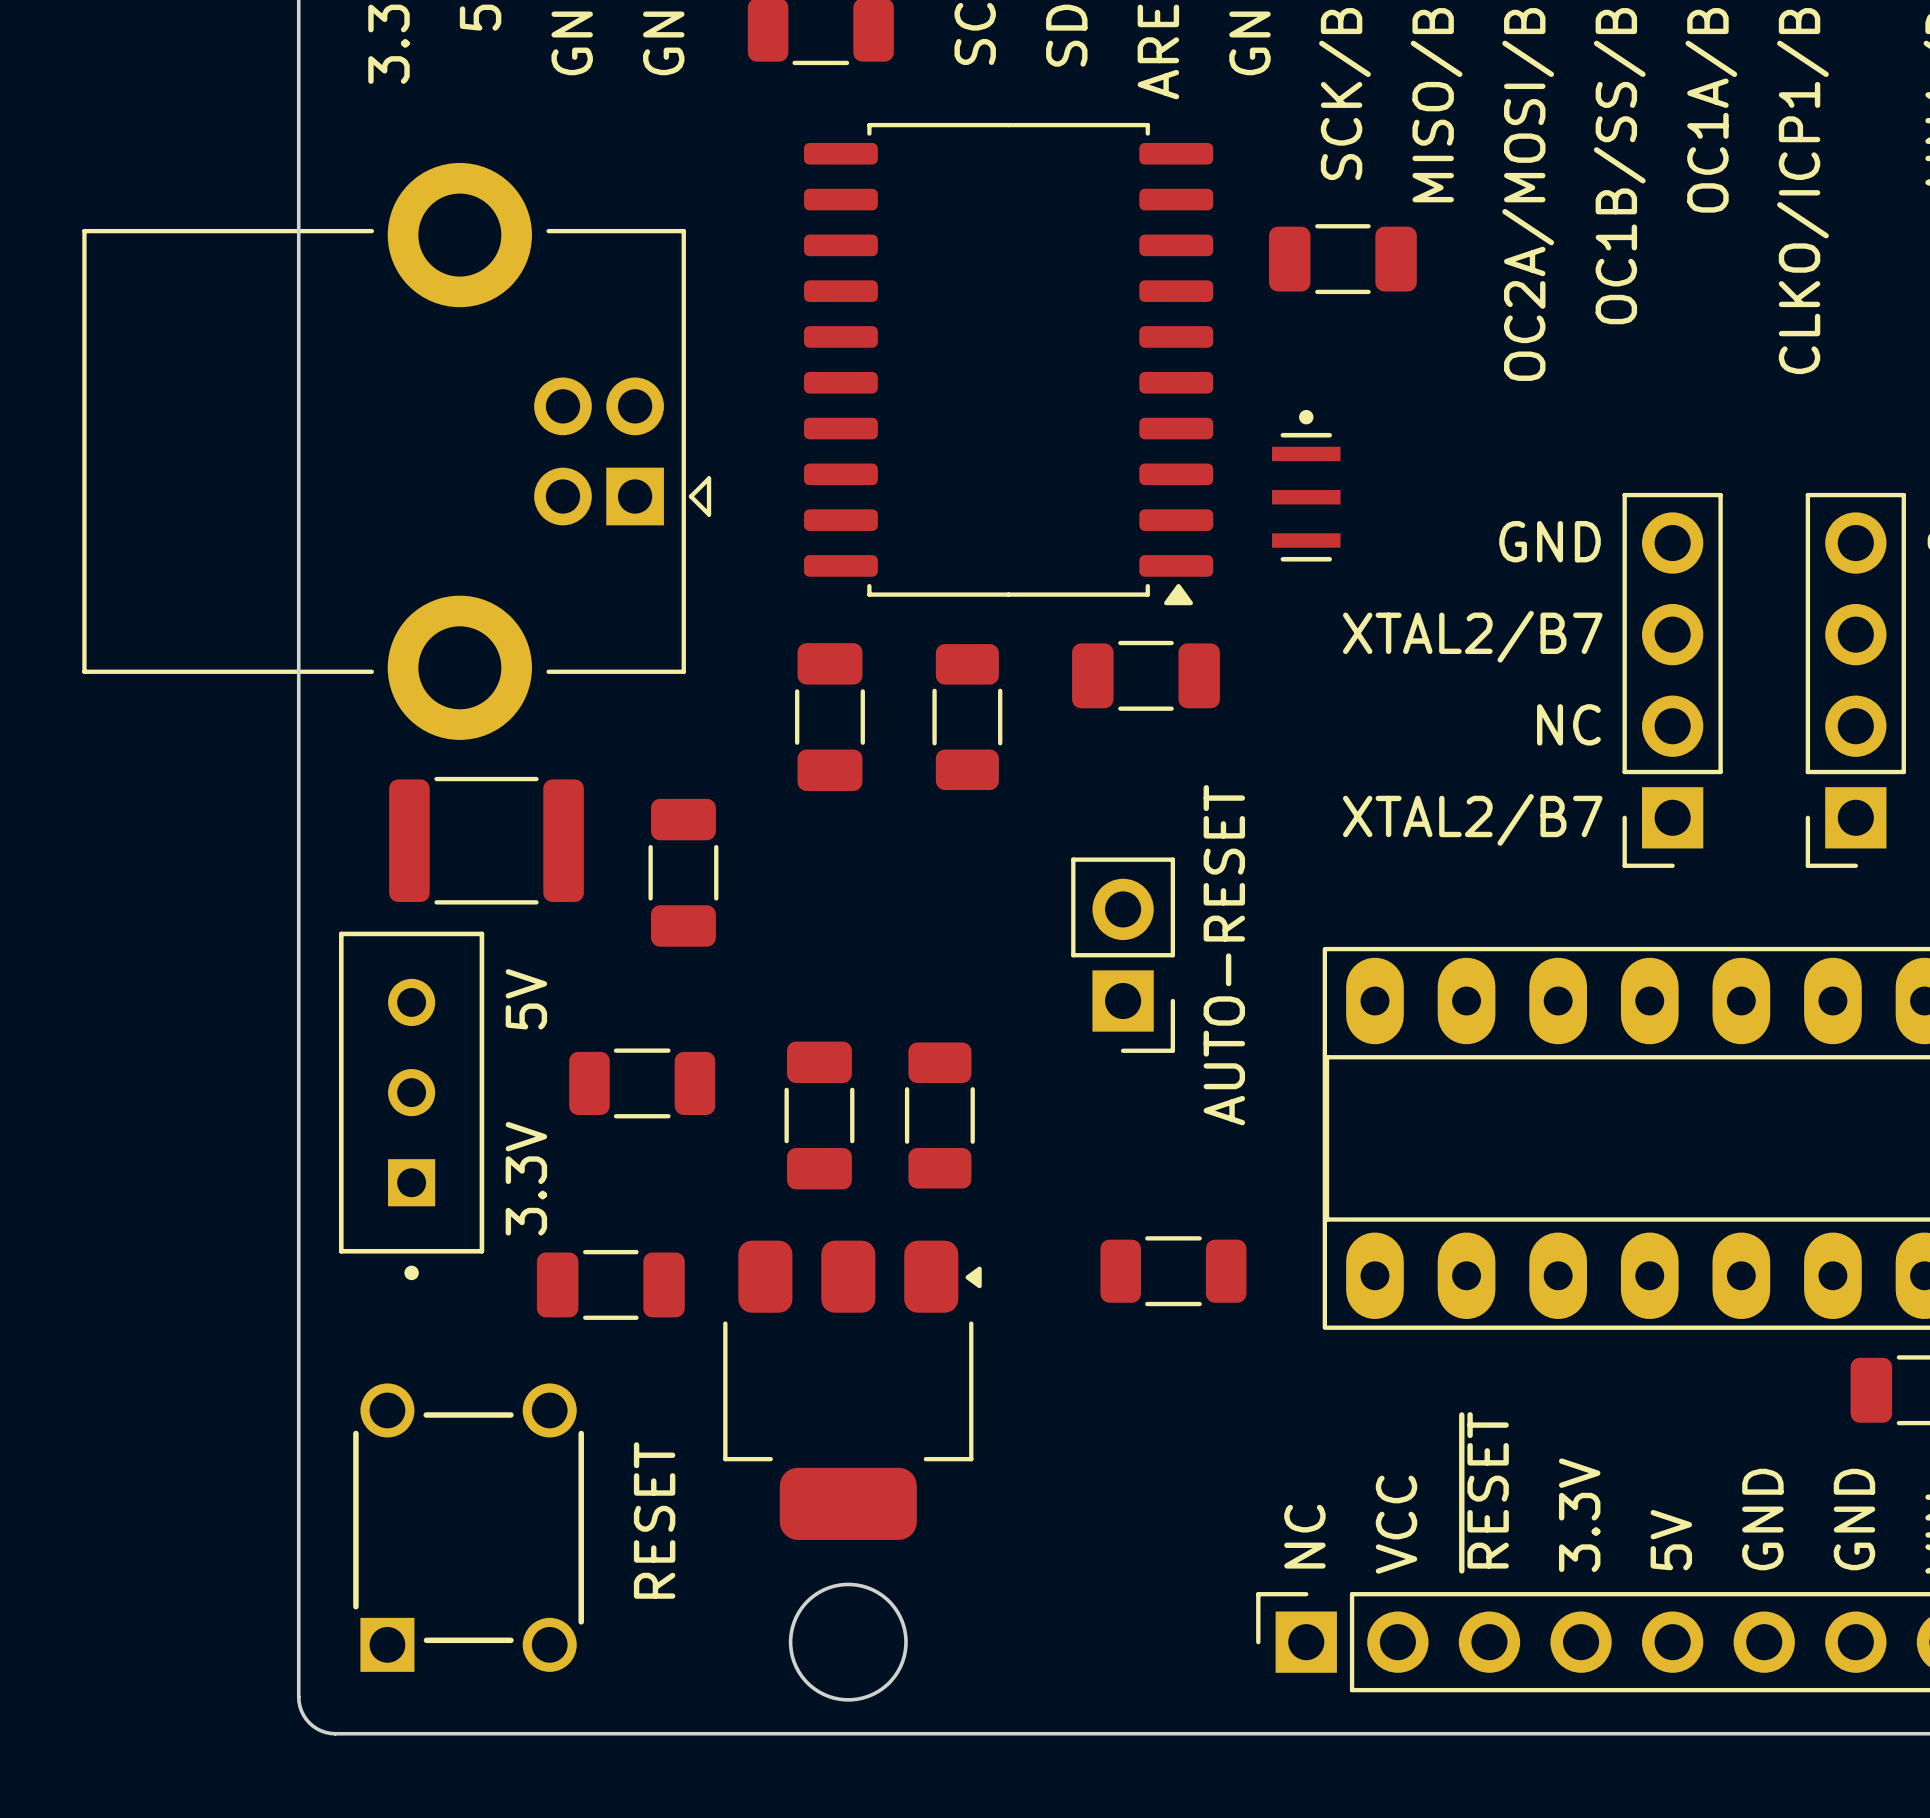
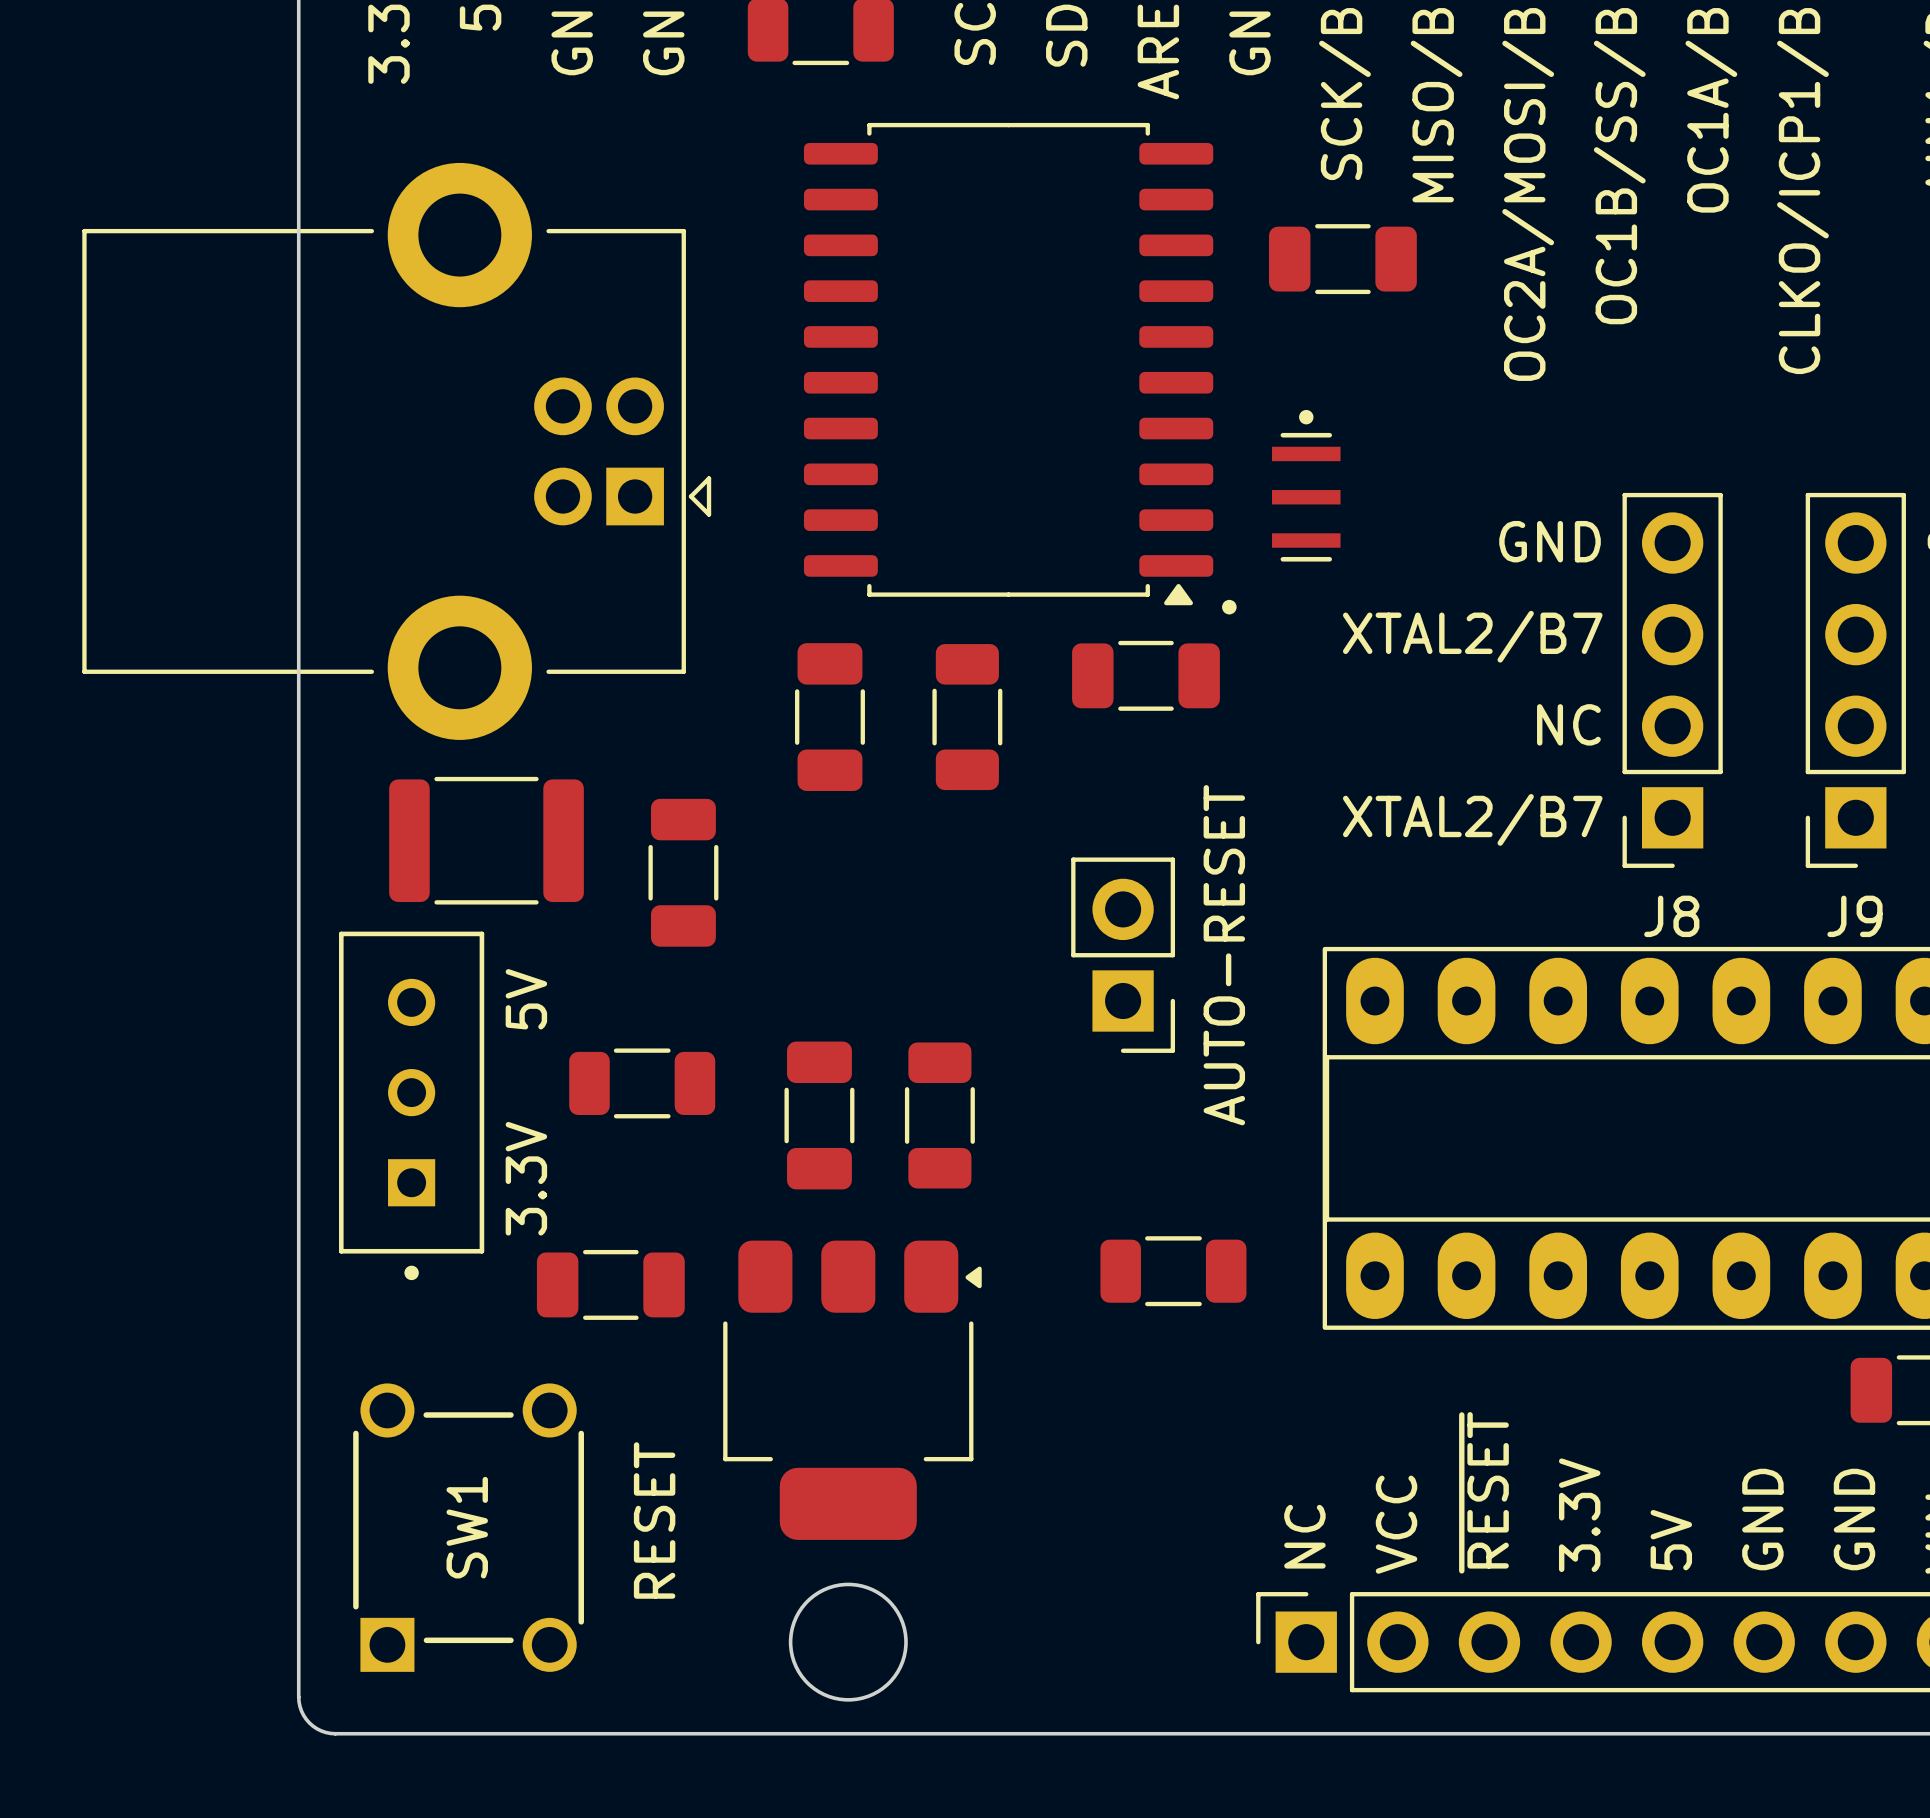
drawing: none -> [1222, 599, 1237, 615]
J8 name: none -> J8 (1671, 916)
J9 name: none -> J9 (1854, 916)
SW1 name: none -> SW1 (467, 1527)

